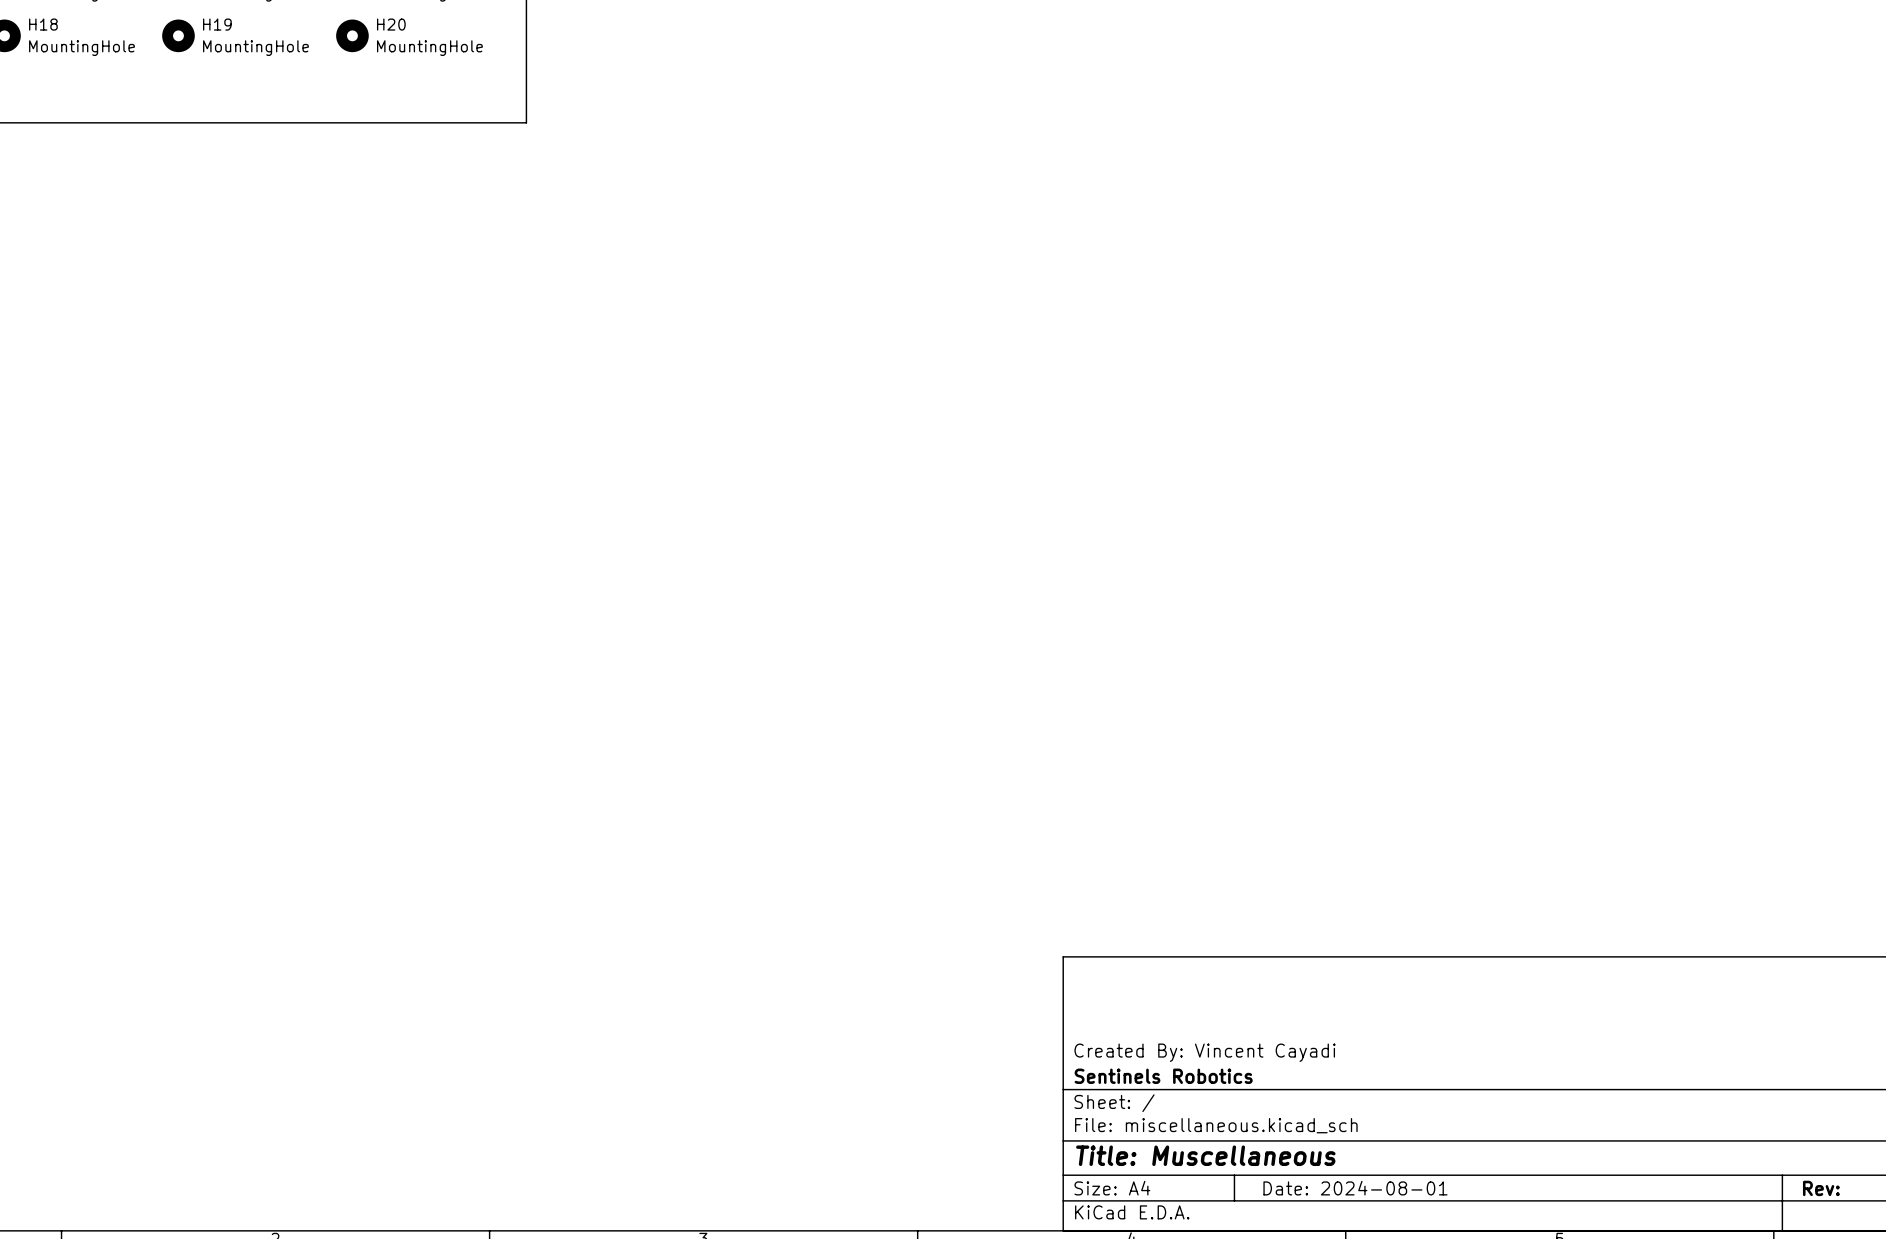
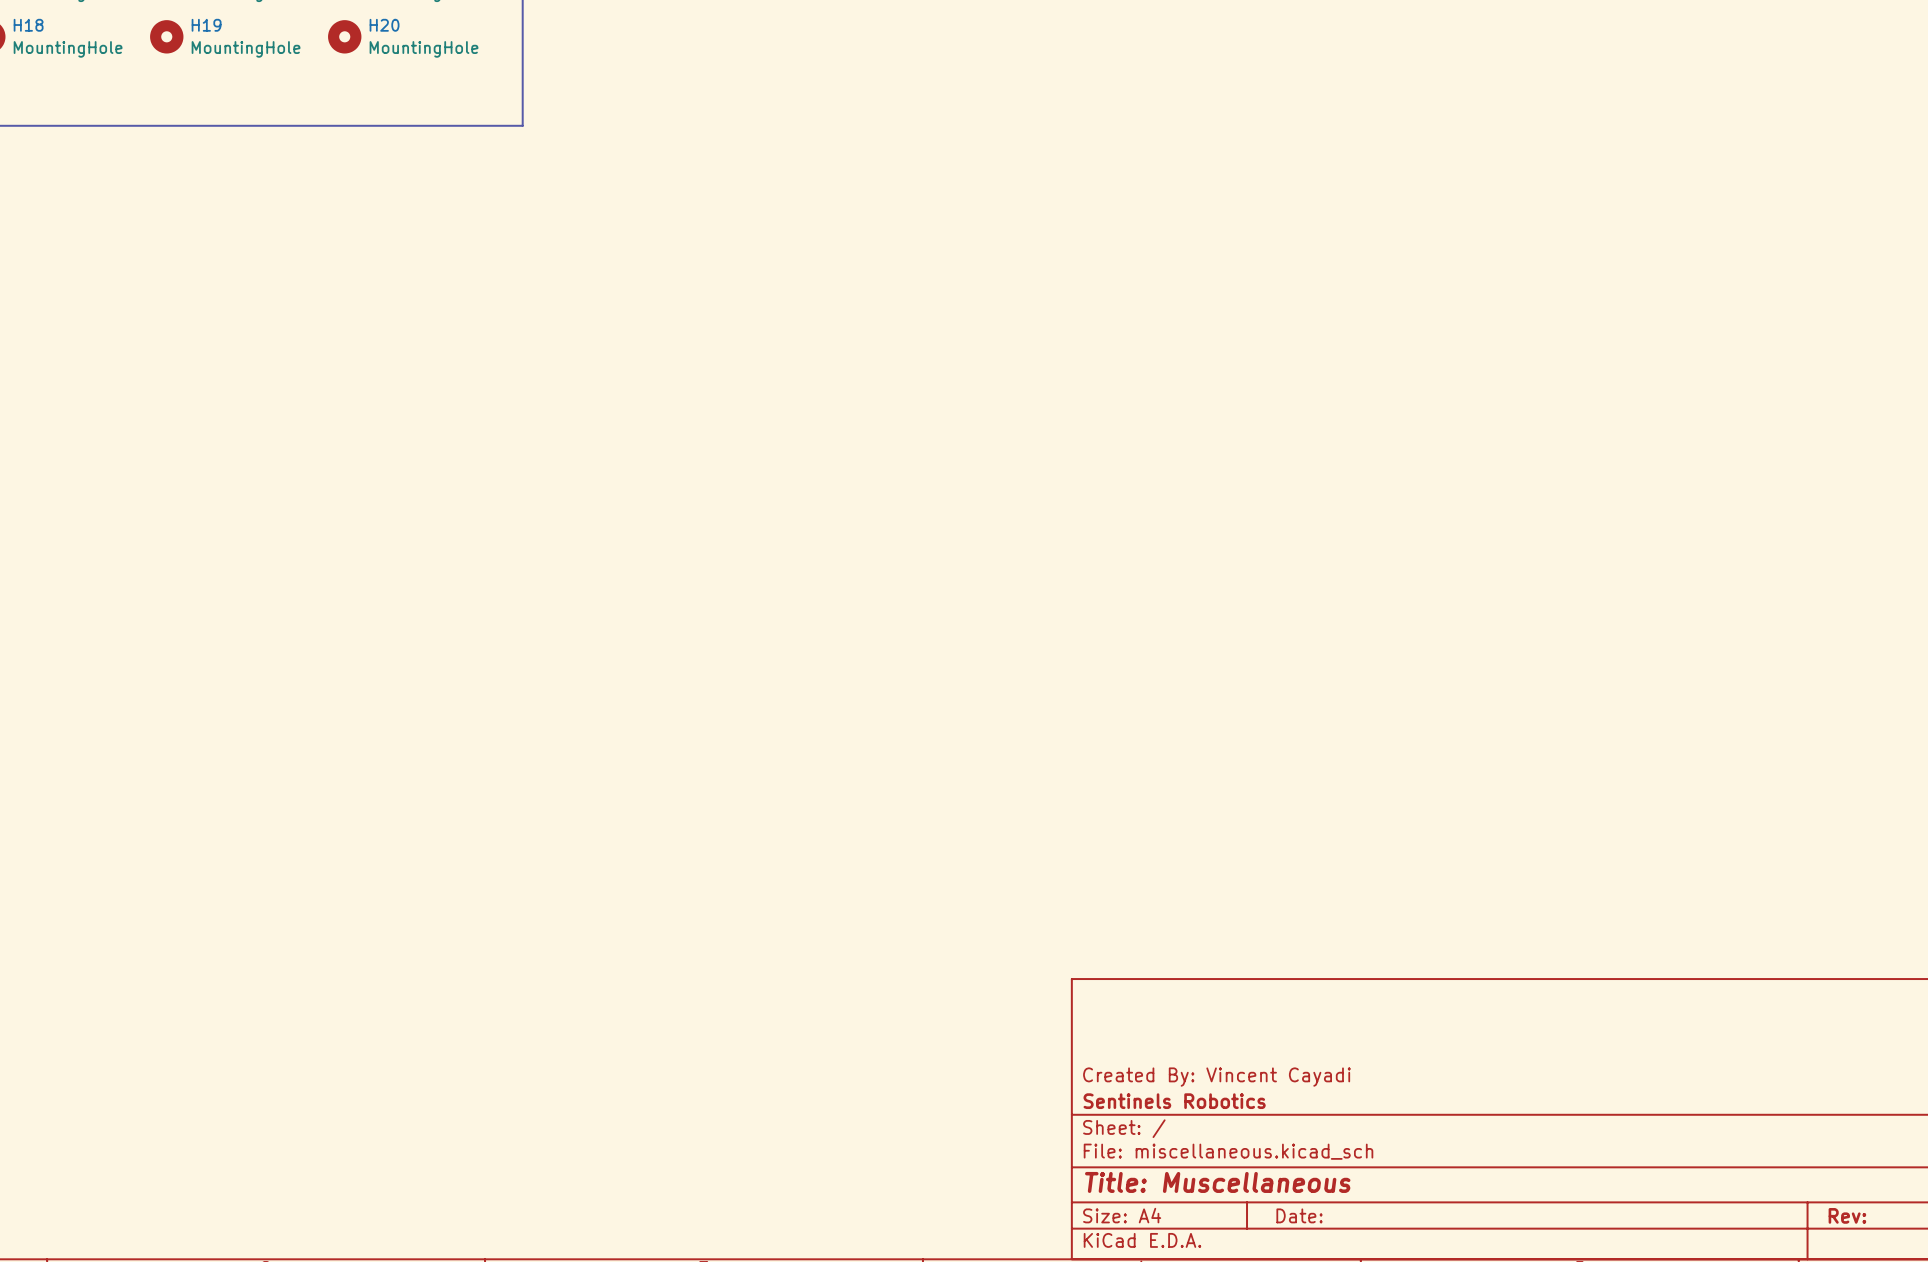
title block: Date: 2024-08-01 (1355, 1188) -> Date: (1299, 1215)

